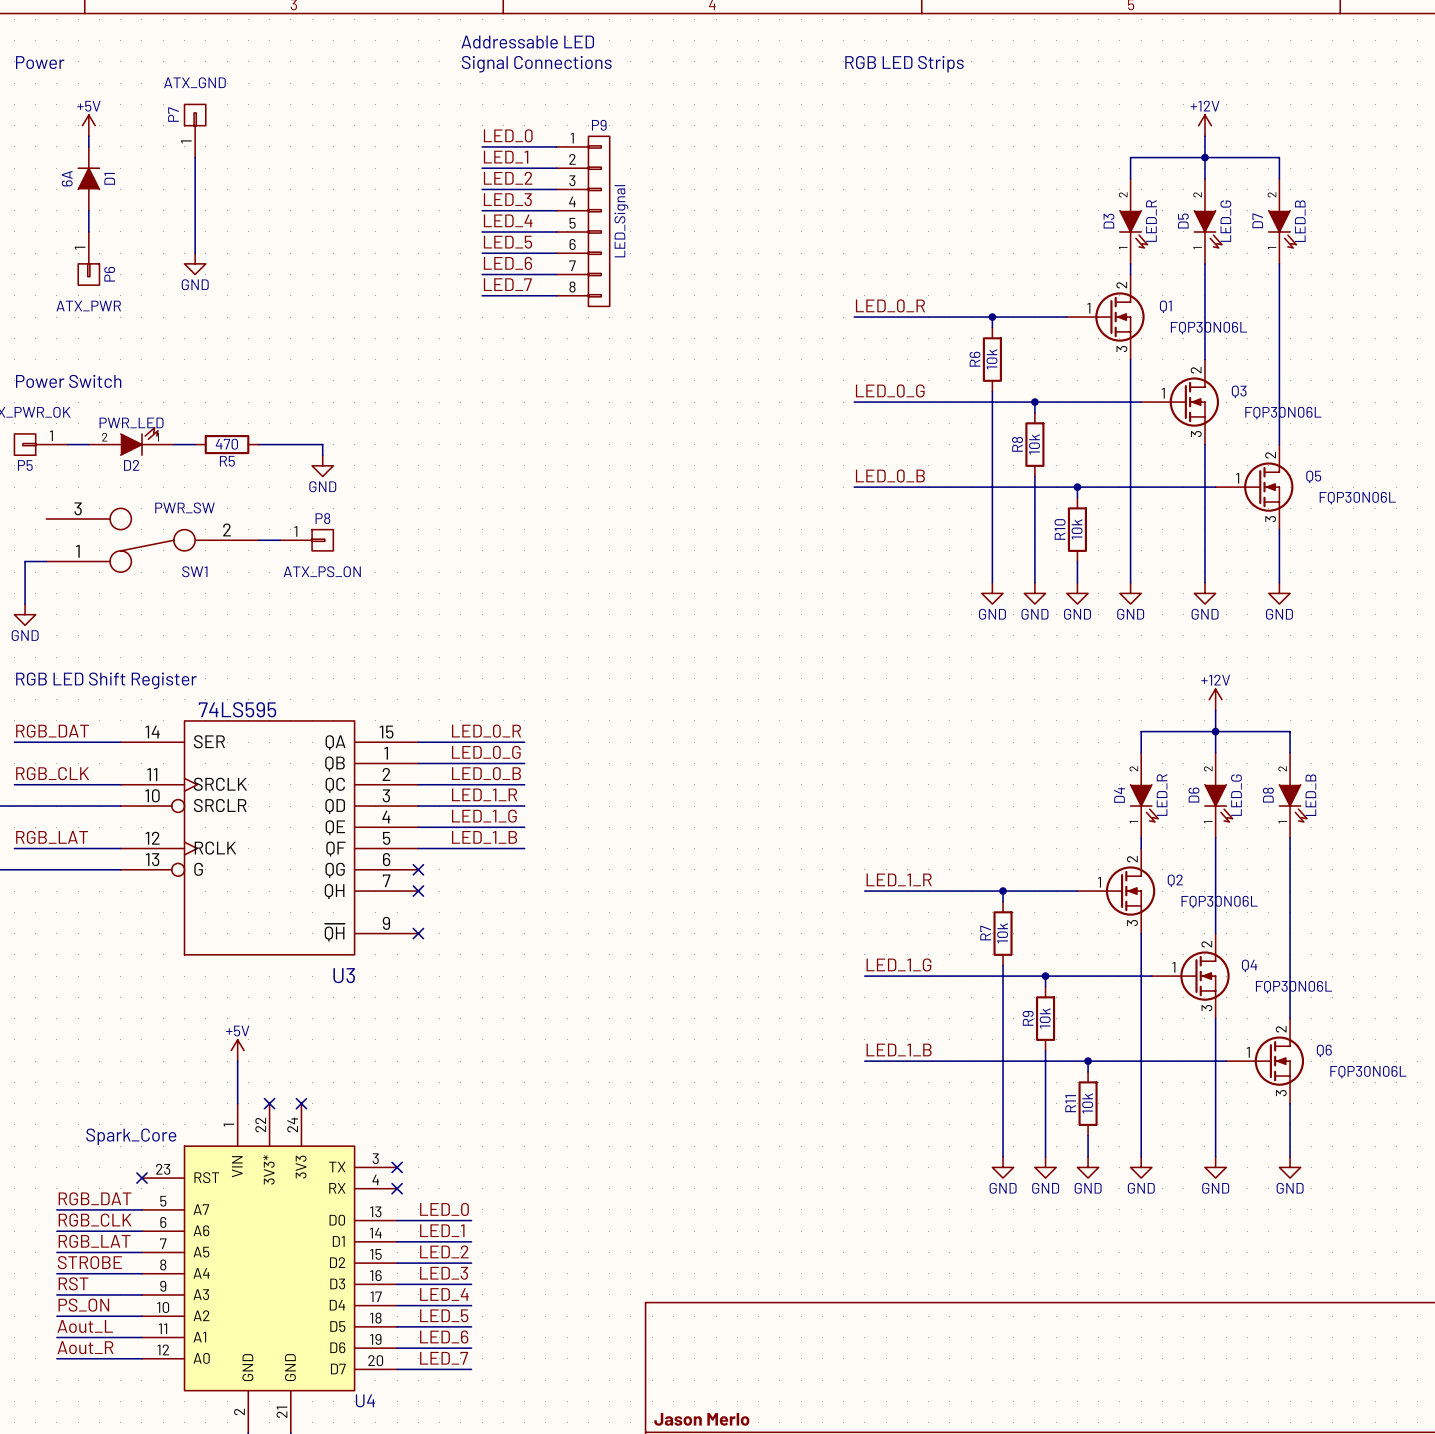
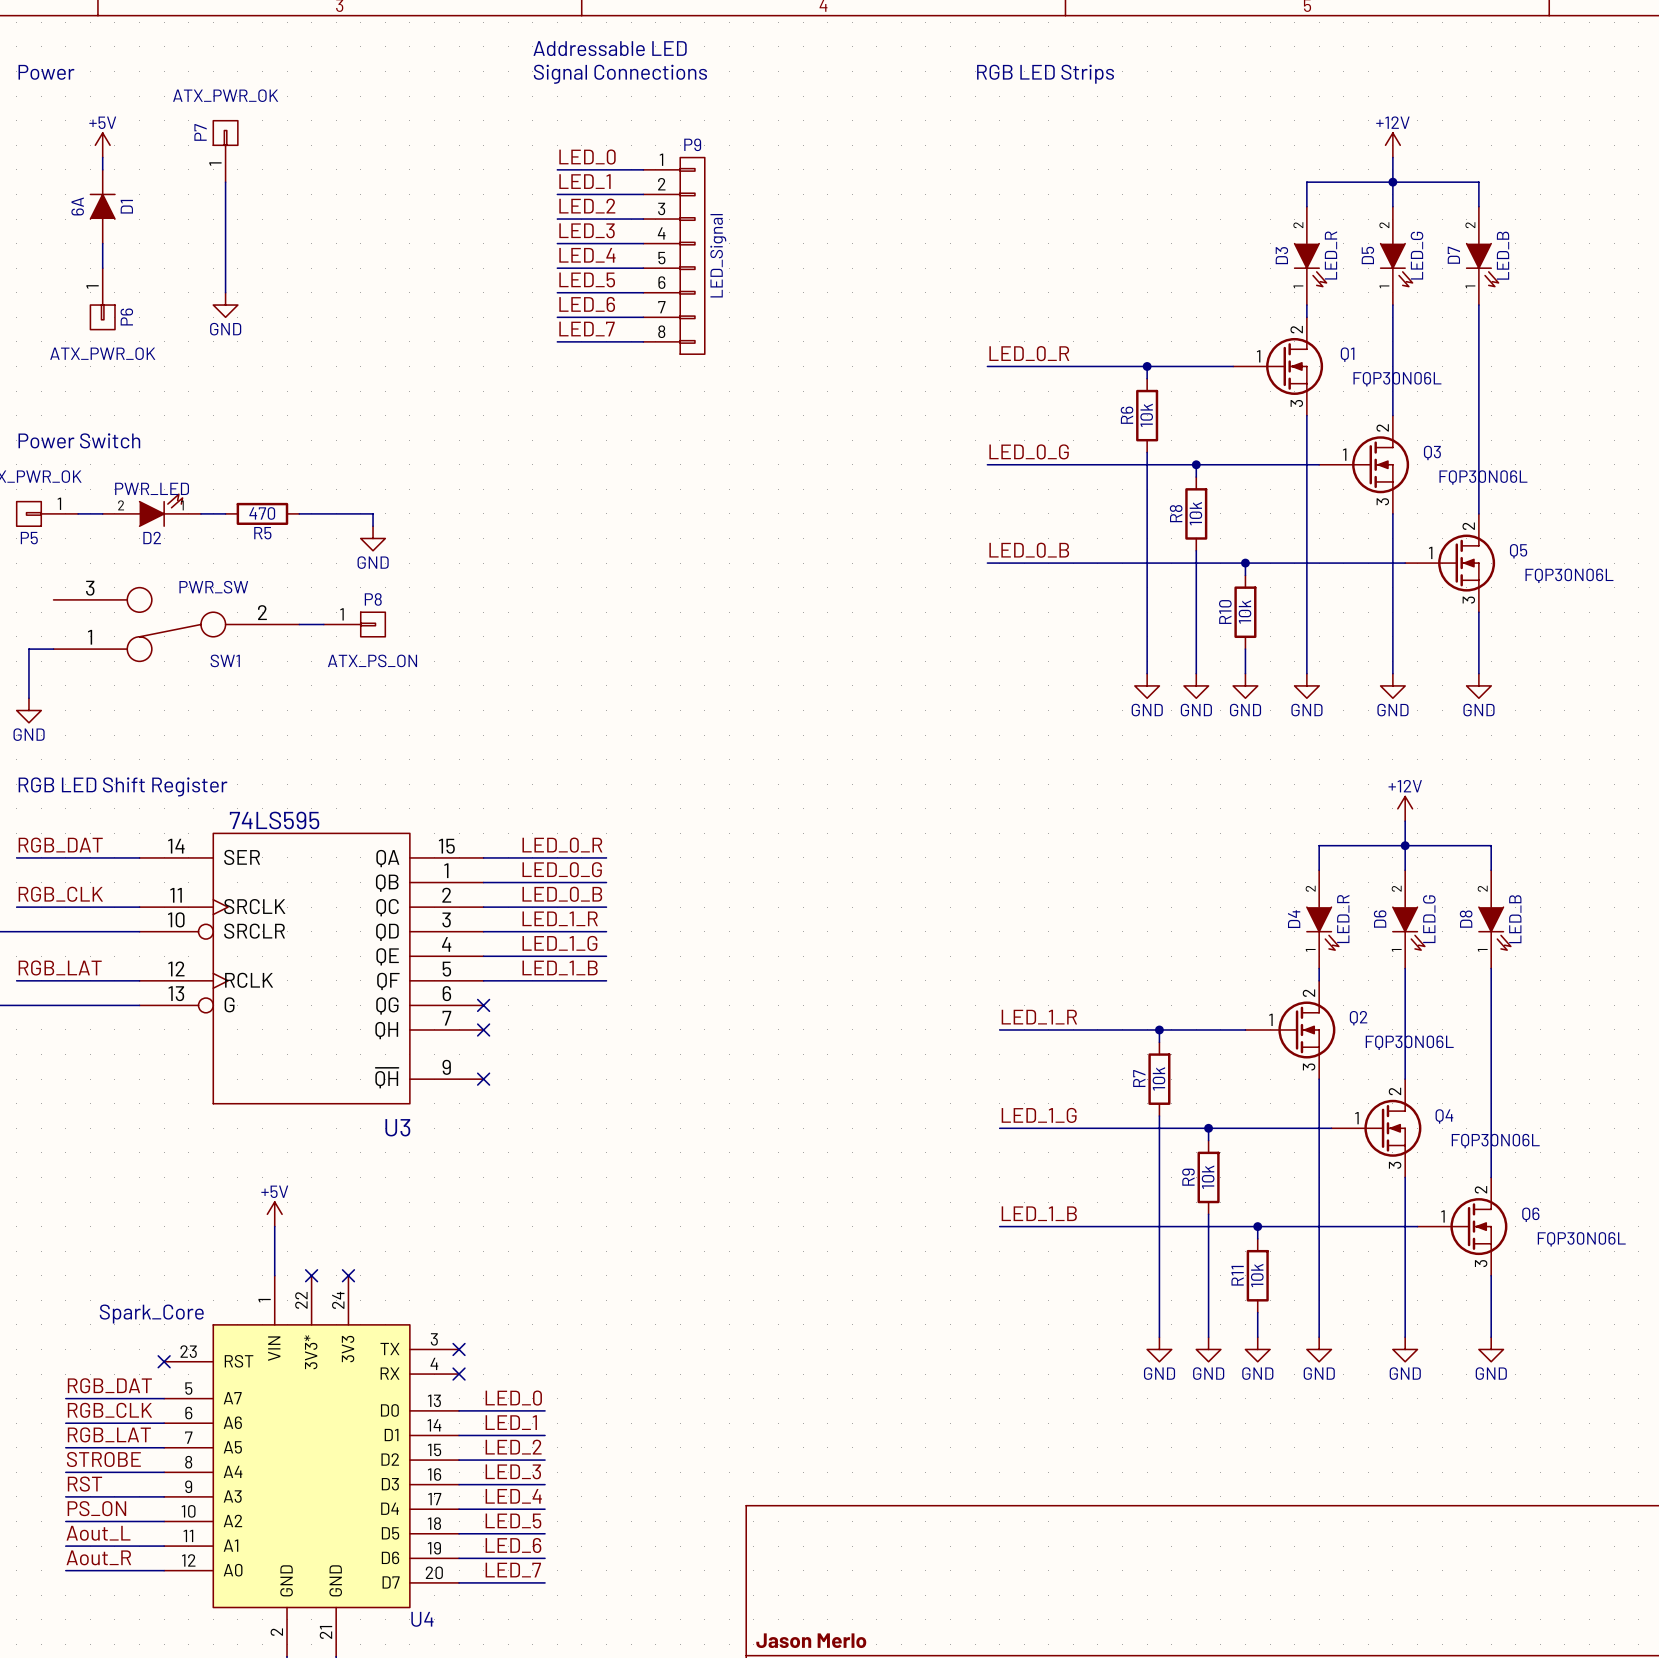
P7 value: ATX_GND (194, 82) -> ATX_PWR_OK (225, 95)
P6 value: ATX_PWR (88, 306) -> ATX_PWR_OK (102, 353)

